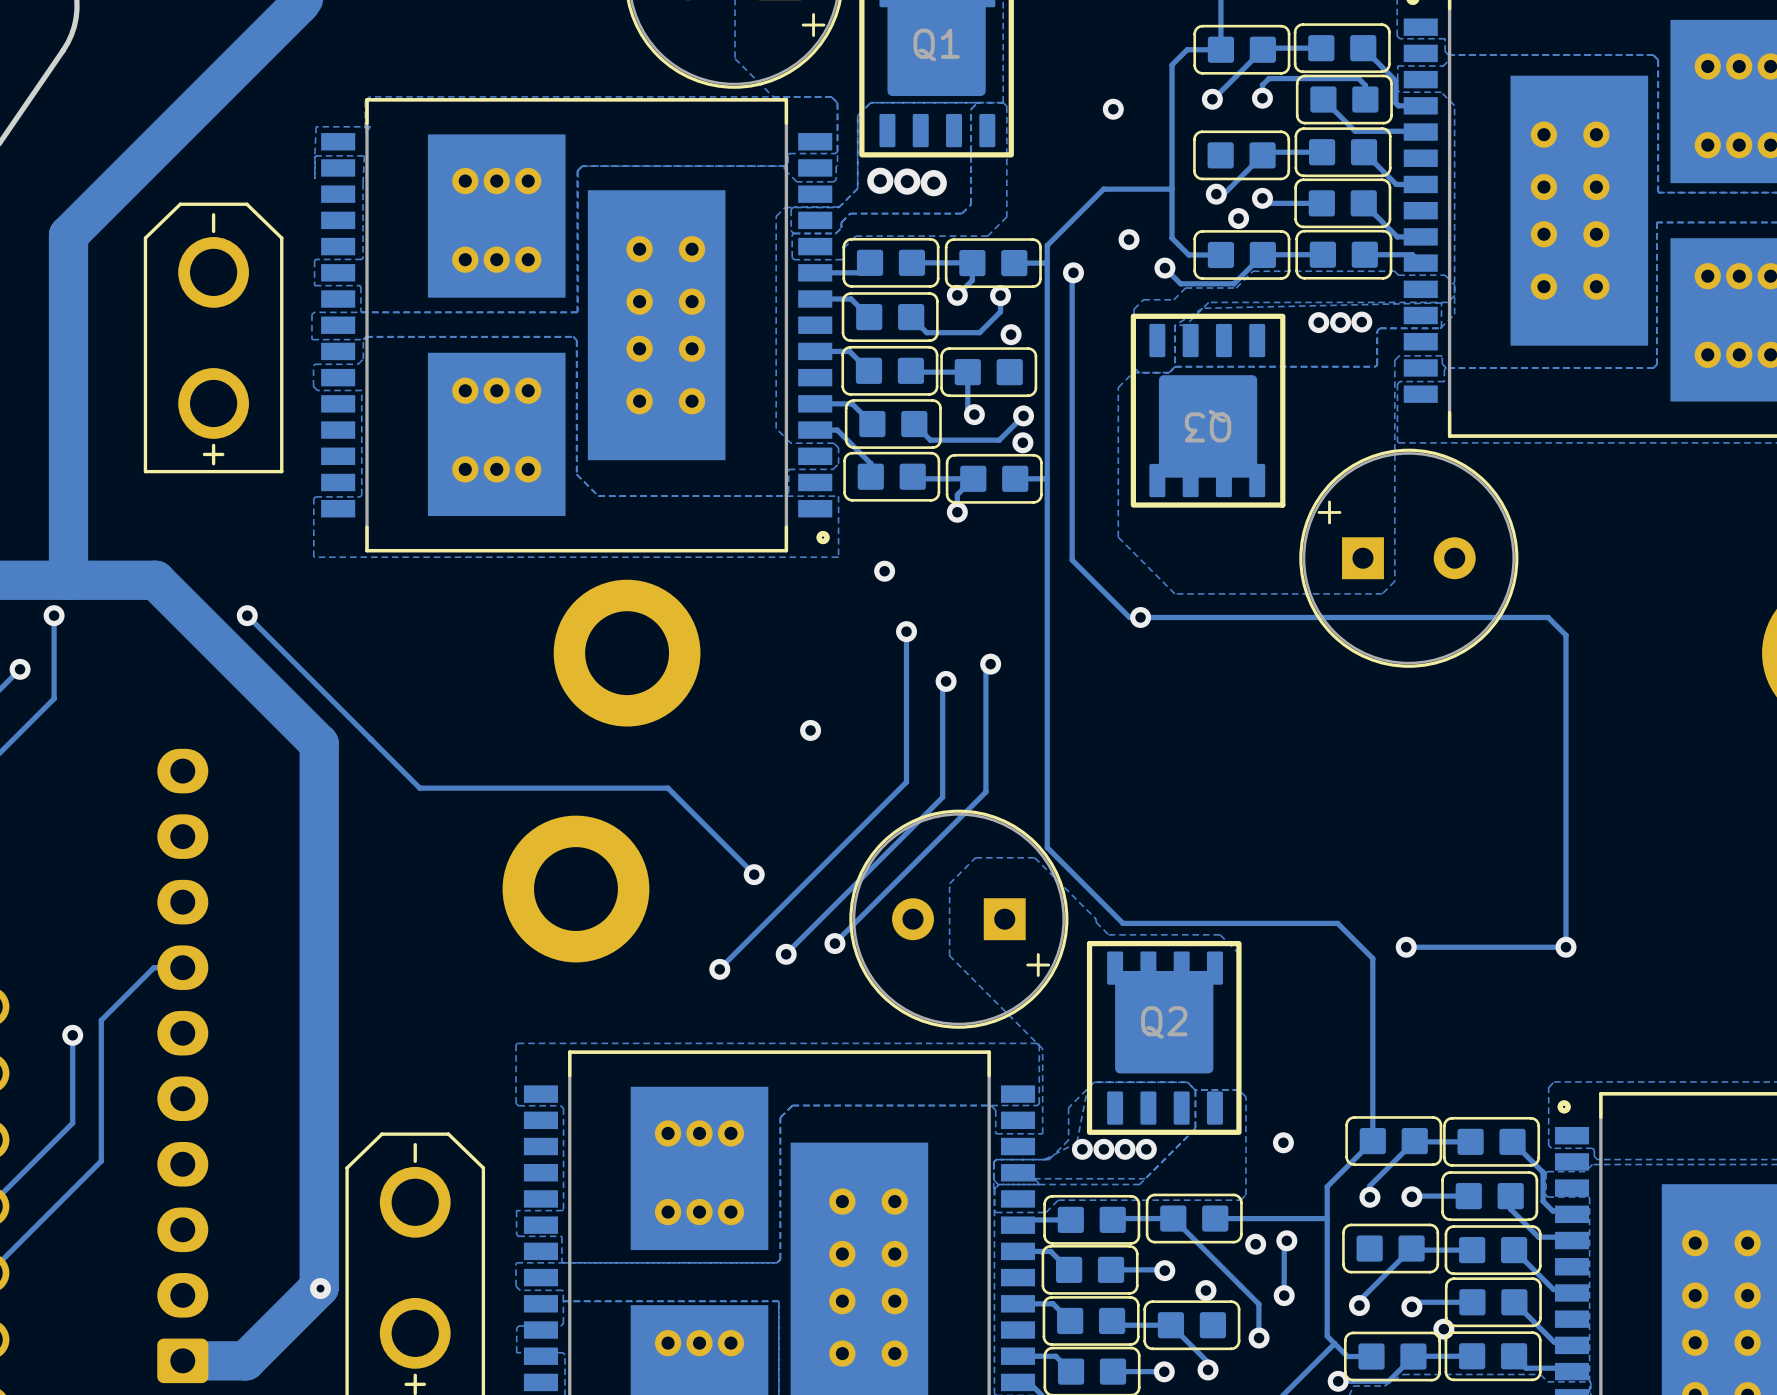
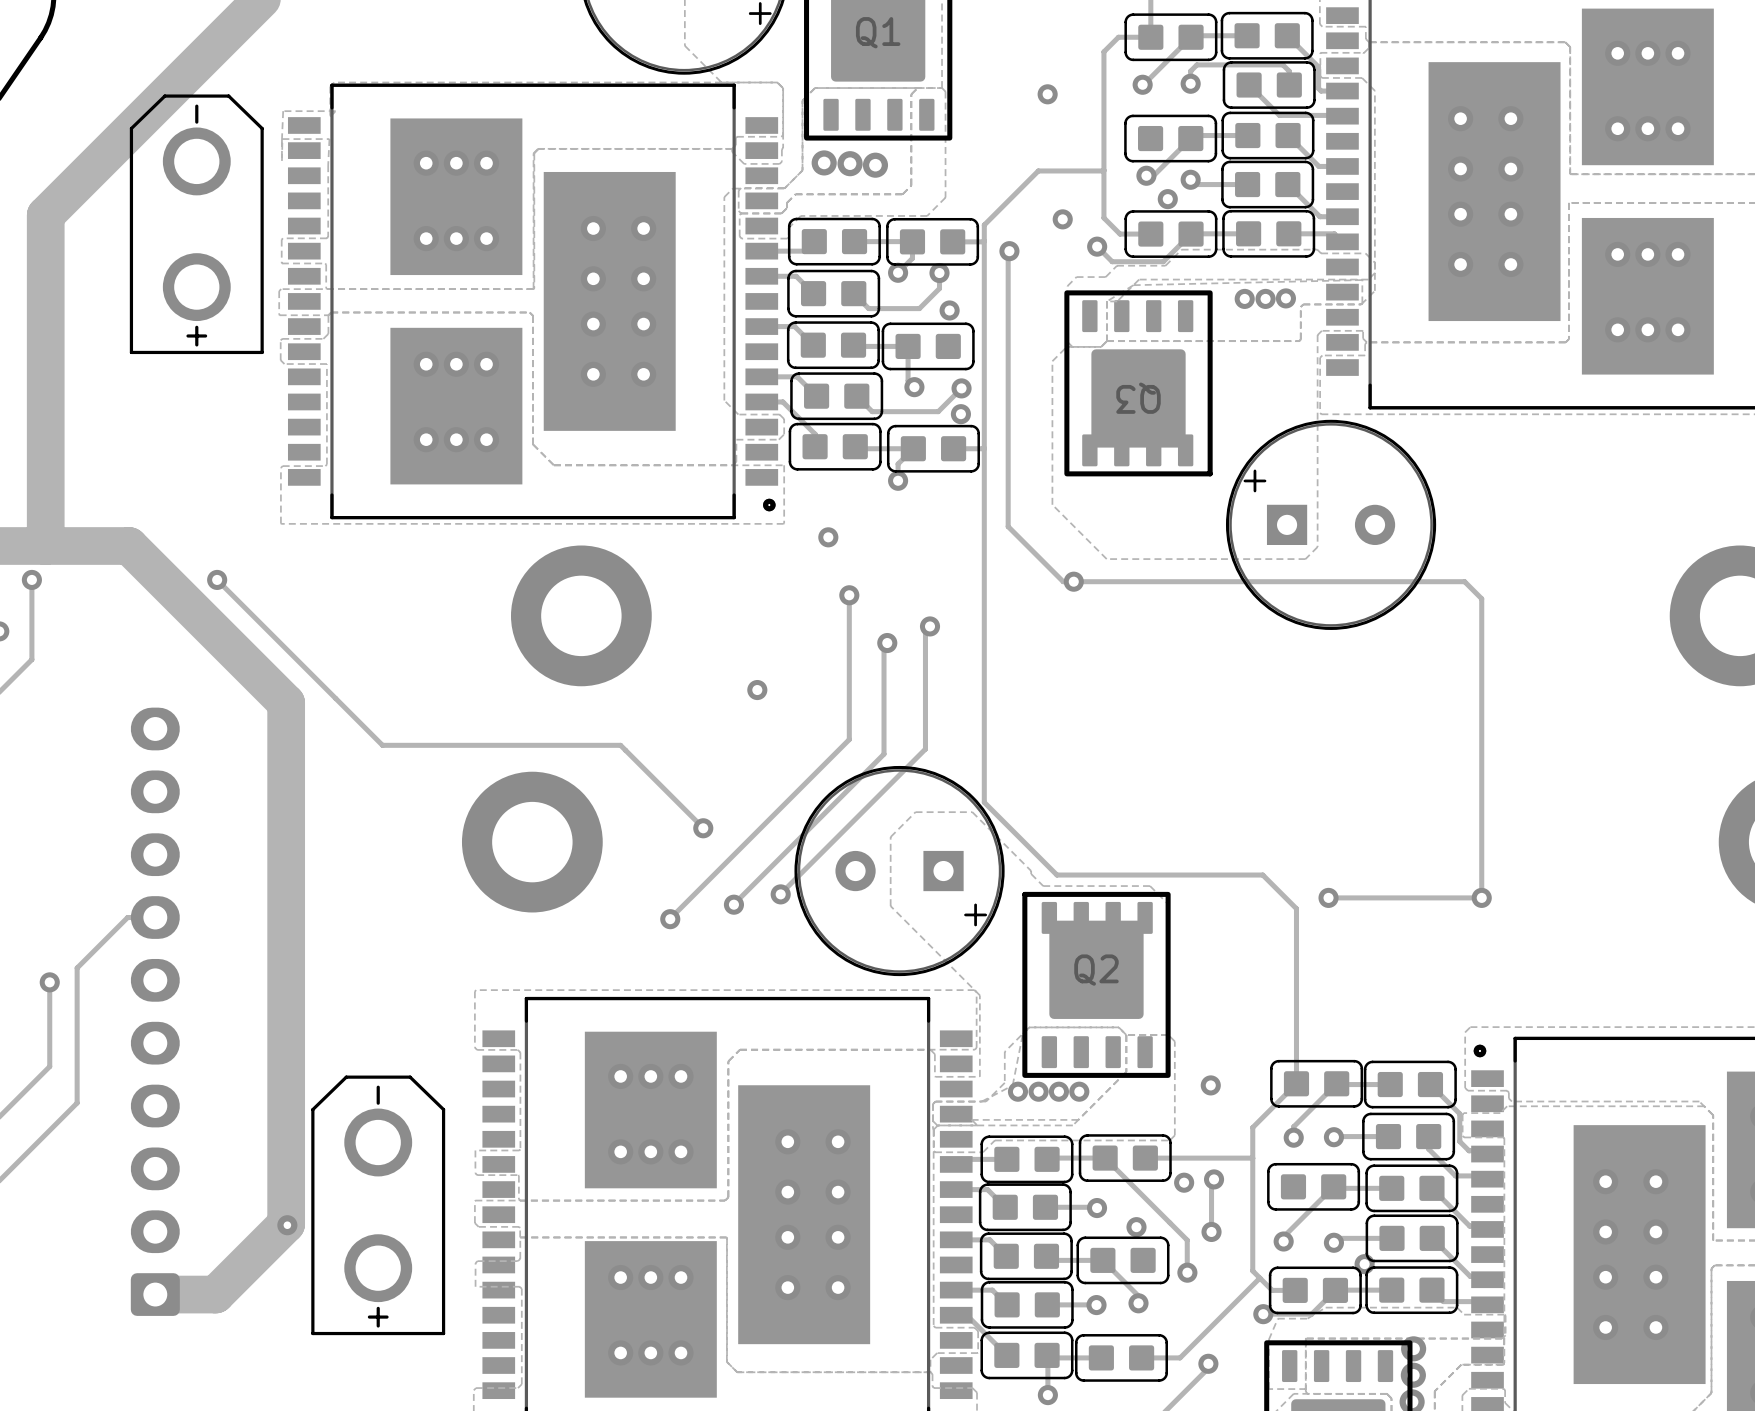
part position: (213, 337) -> (196, 224)

